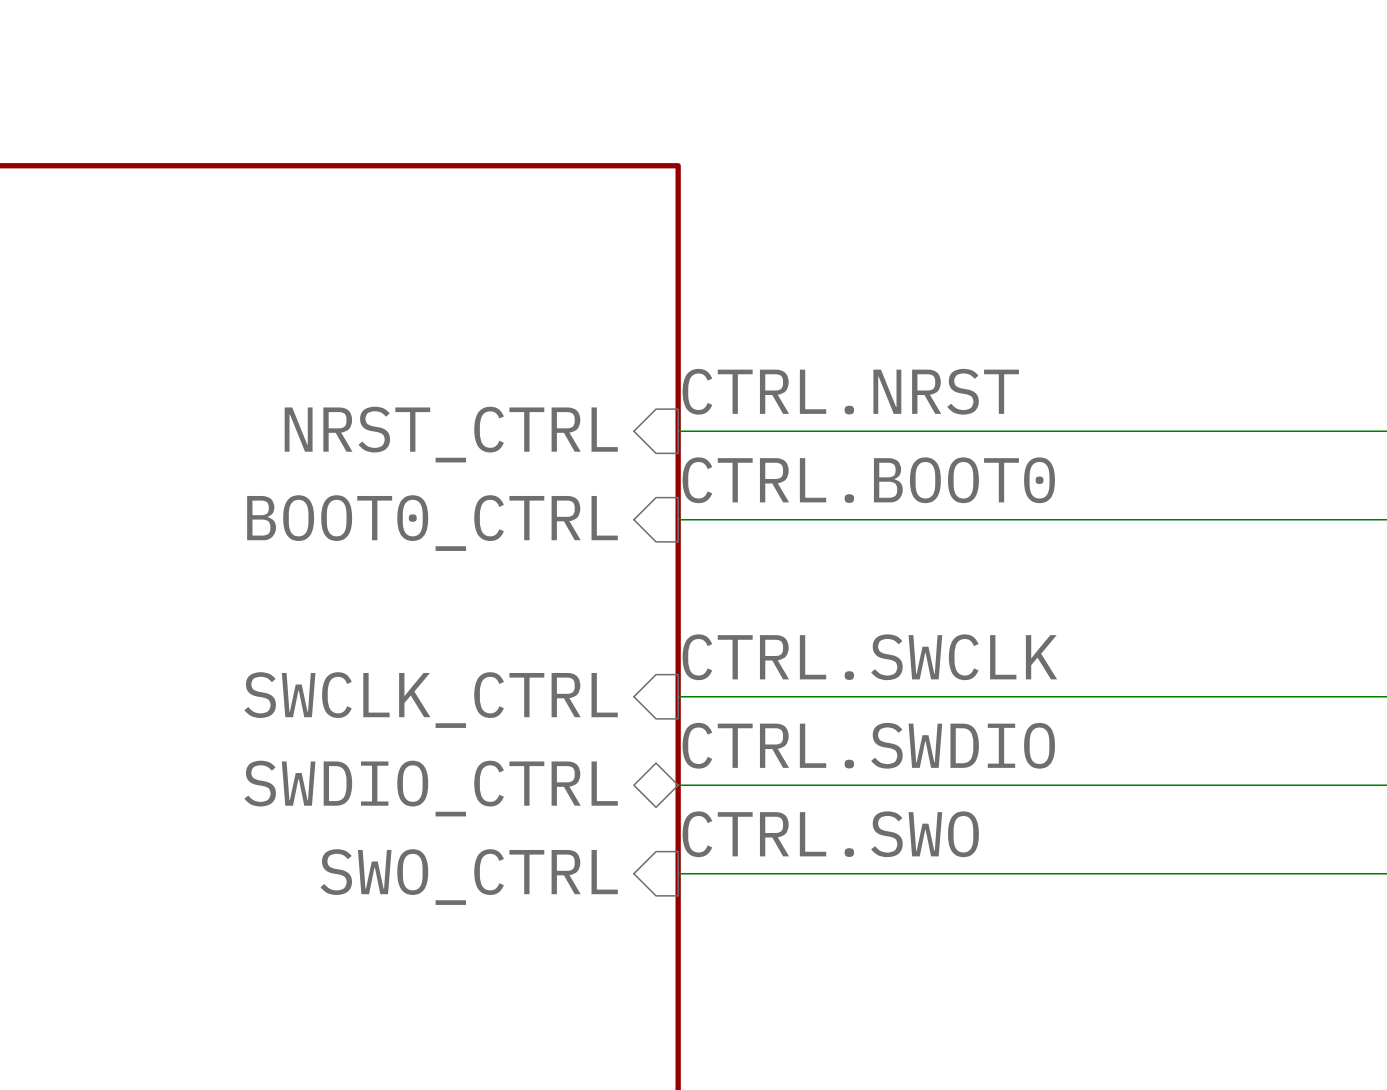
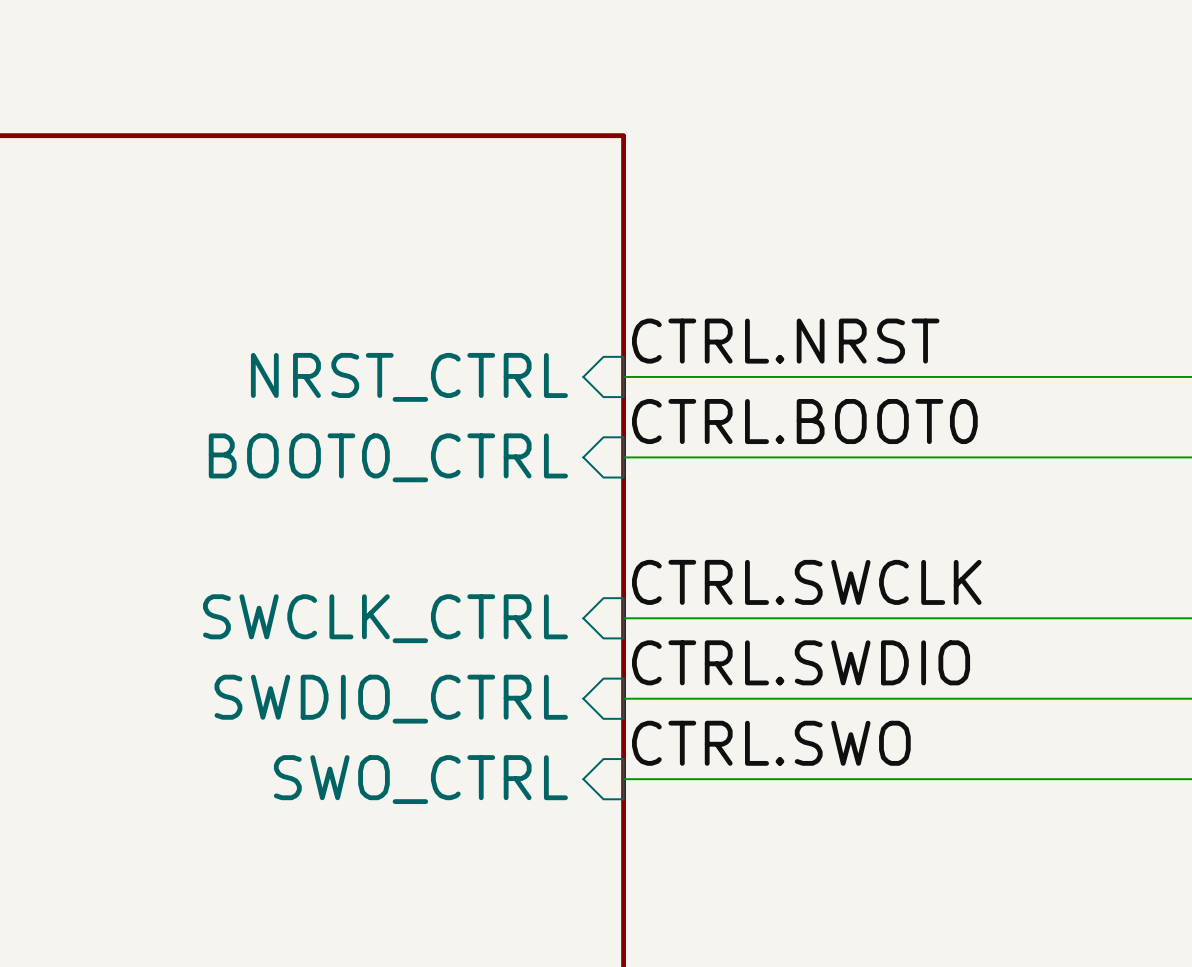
sheet pin shape: bidirectional (431, 788) -> input (391, 699)

